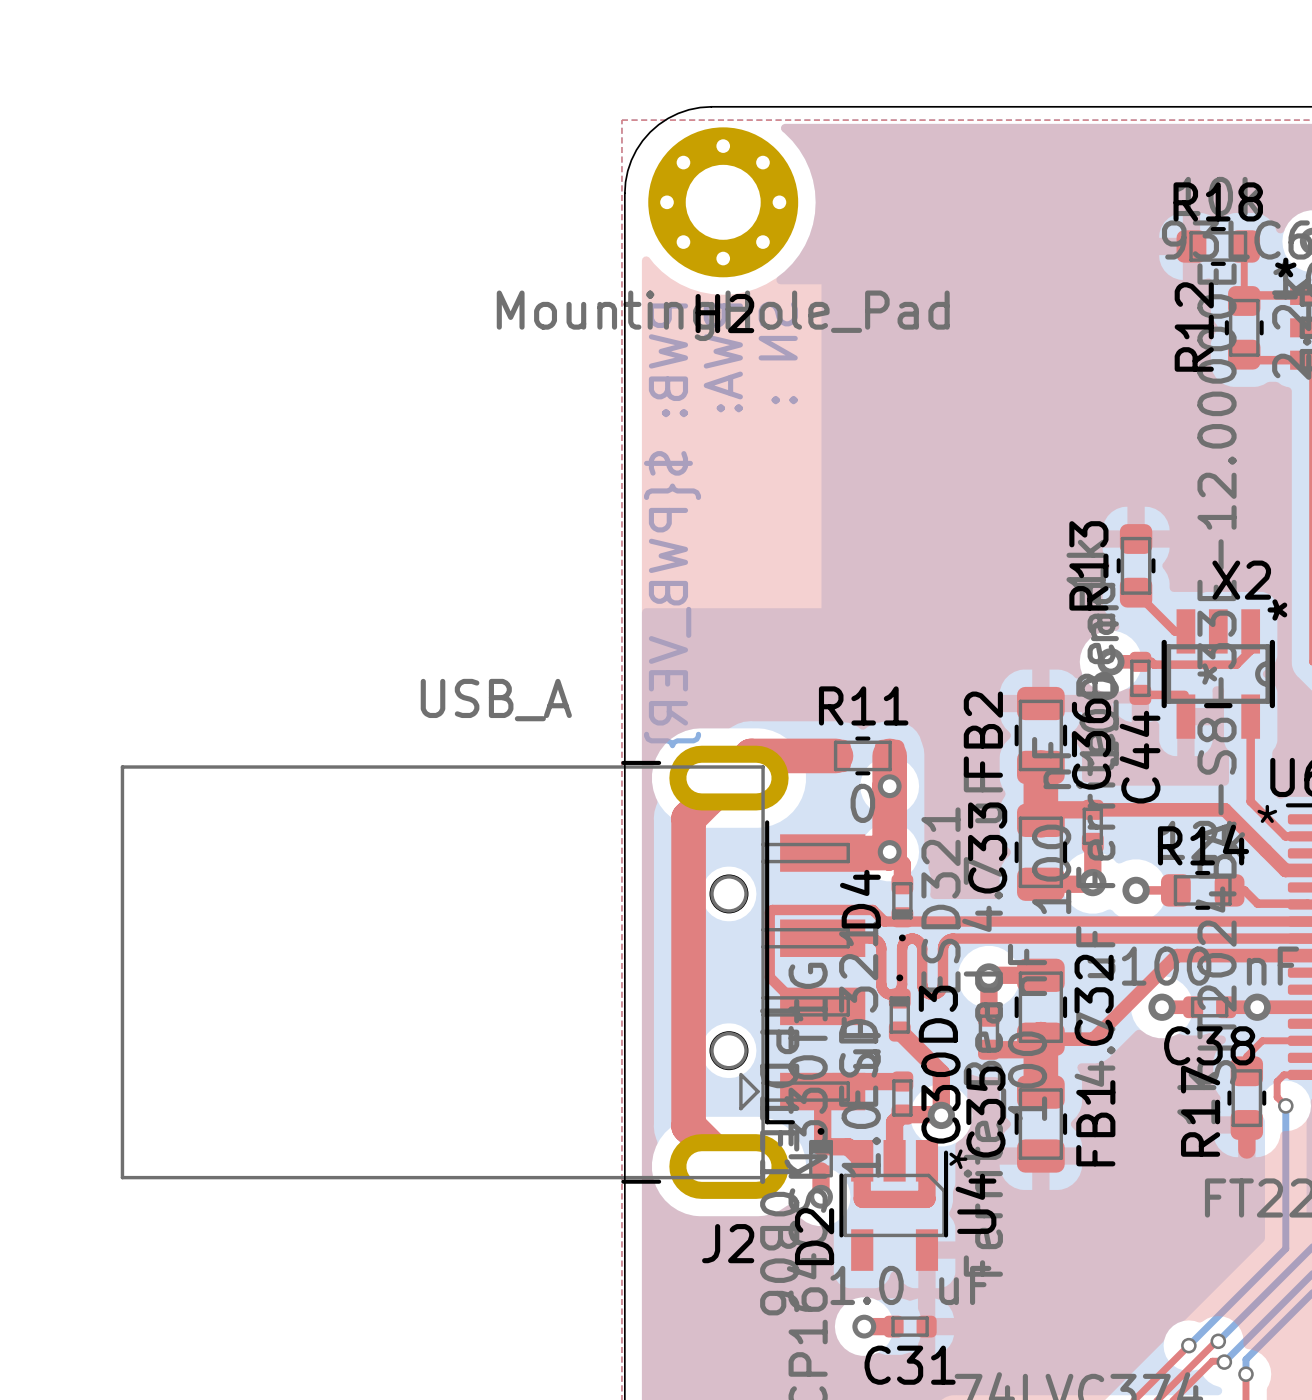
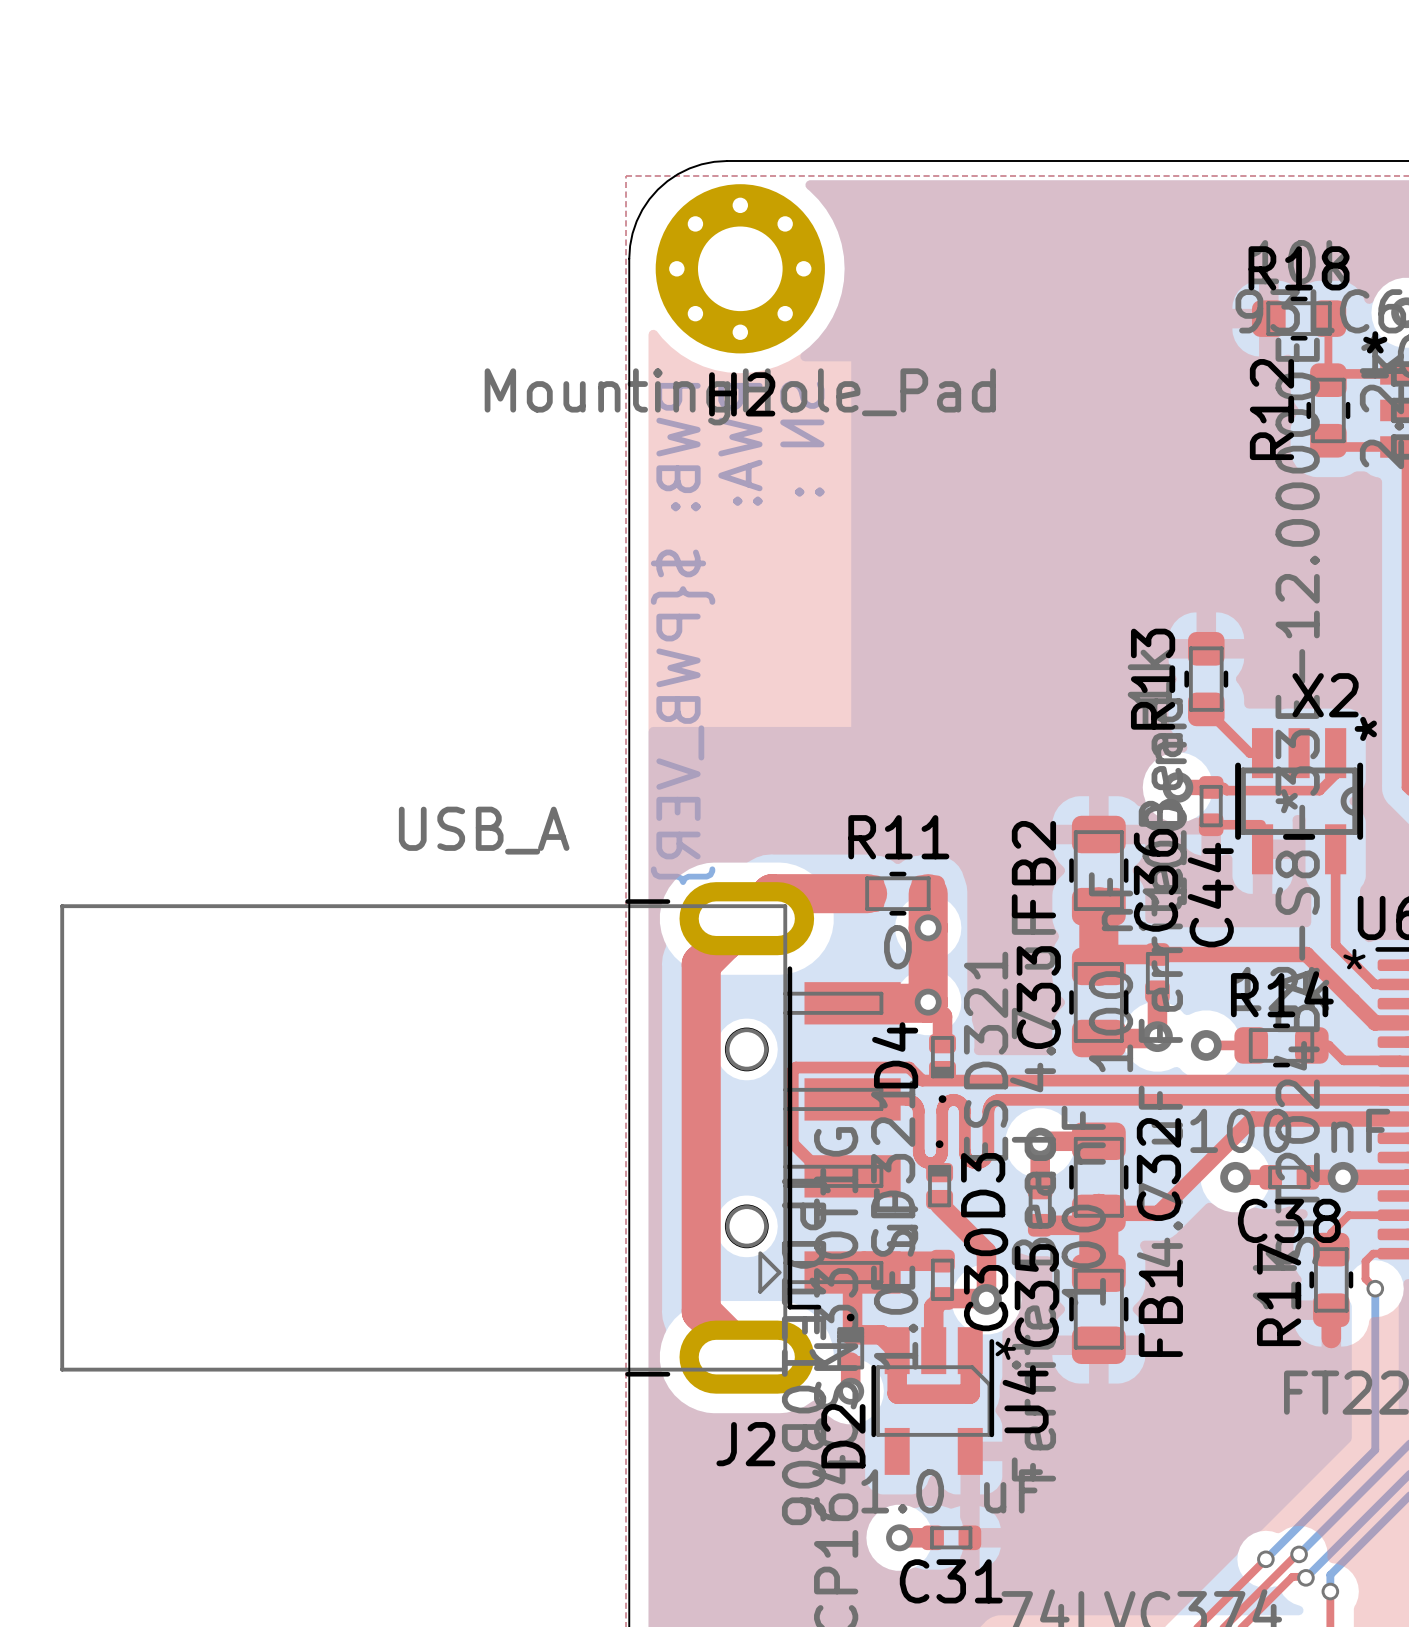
D4 footprint: [891, 874, 914, 942] -> [929, 1034, 956, 1103]
D3 footprint: [888, 974, 911, 1042] -> [926, 1140, 954, 1210]

